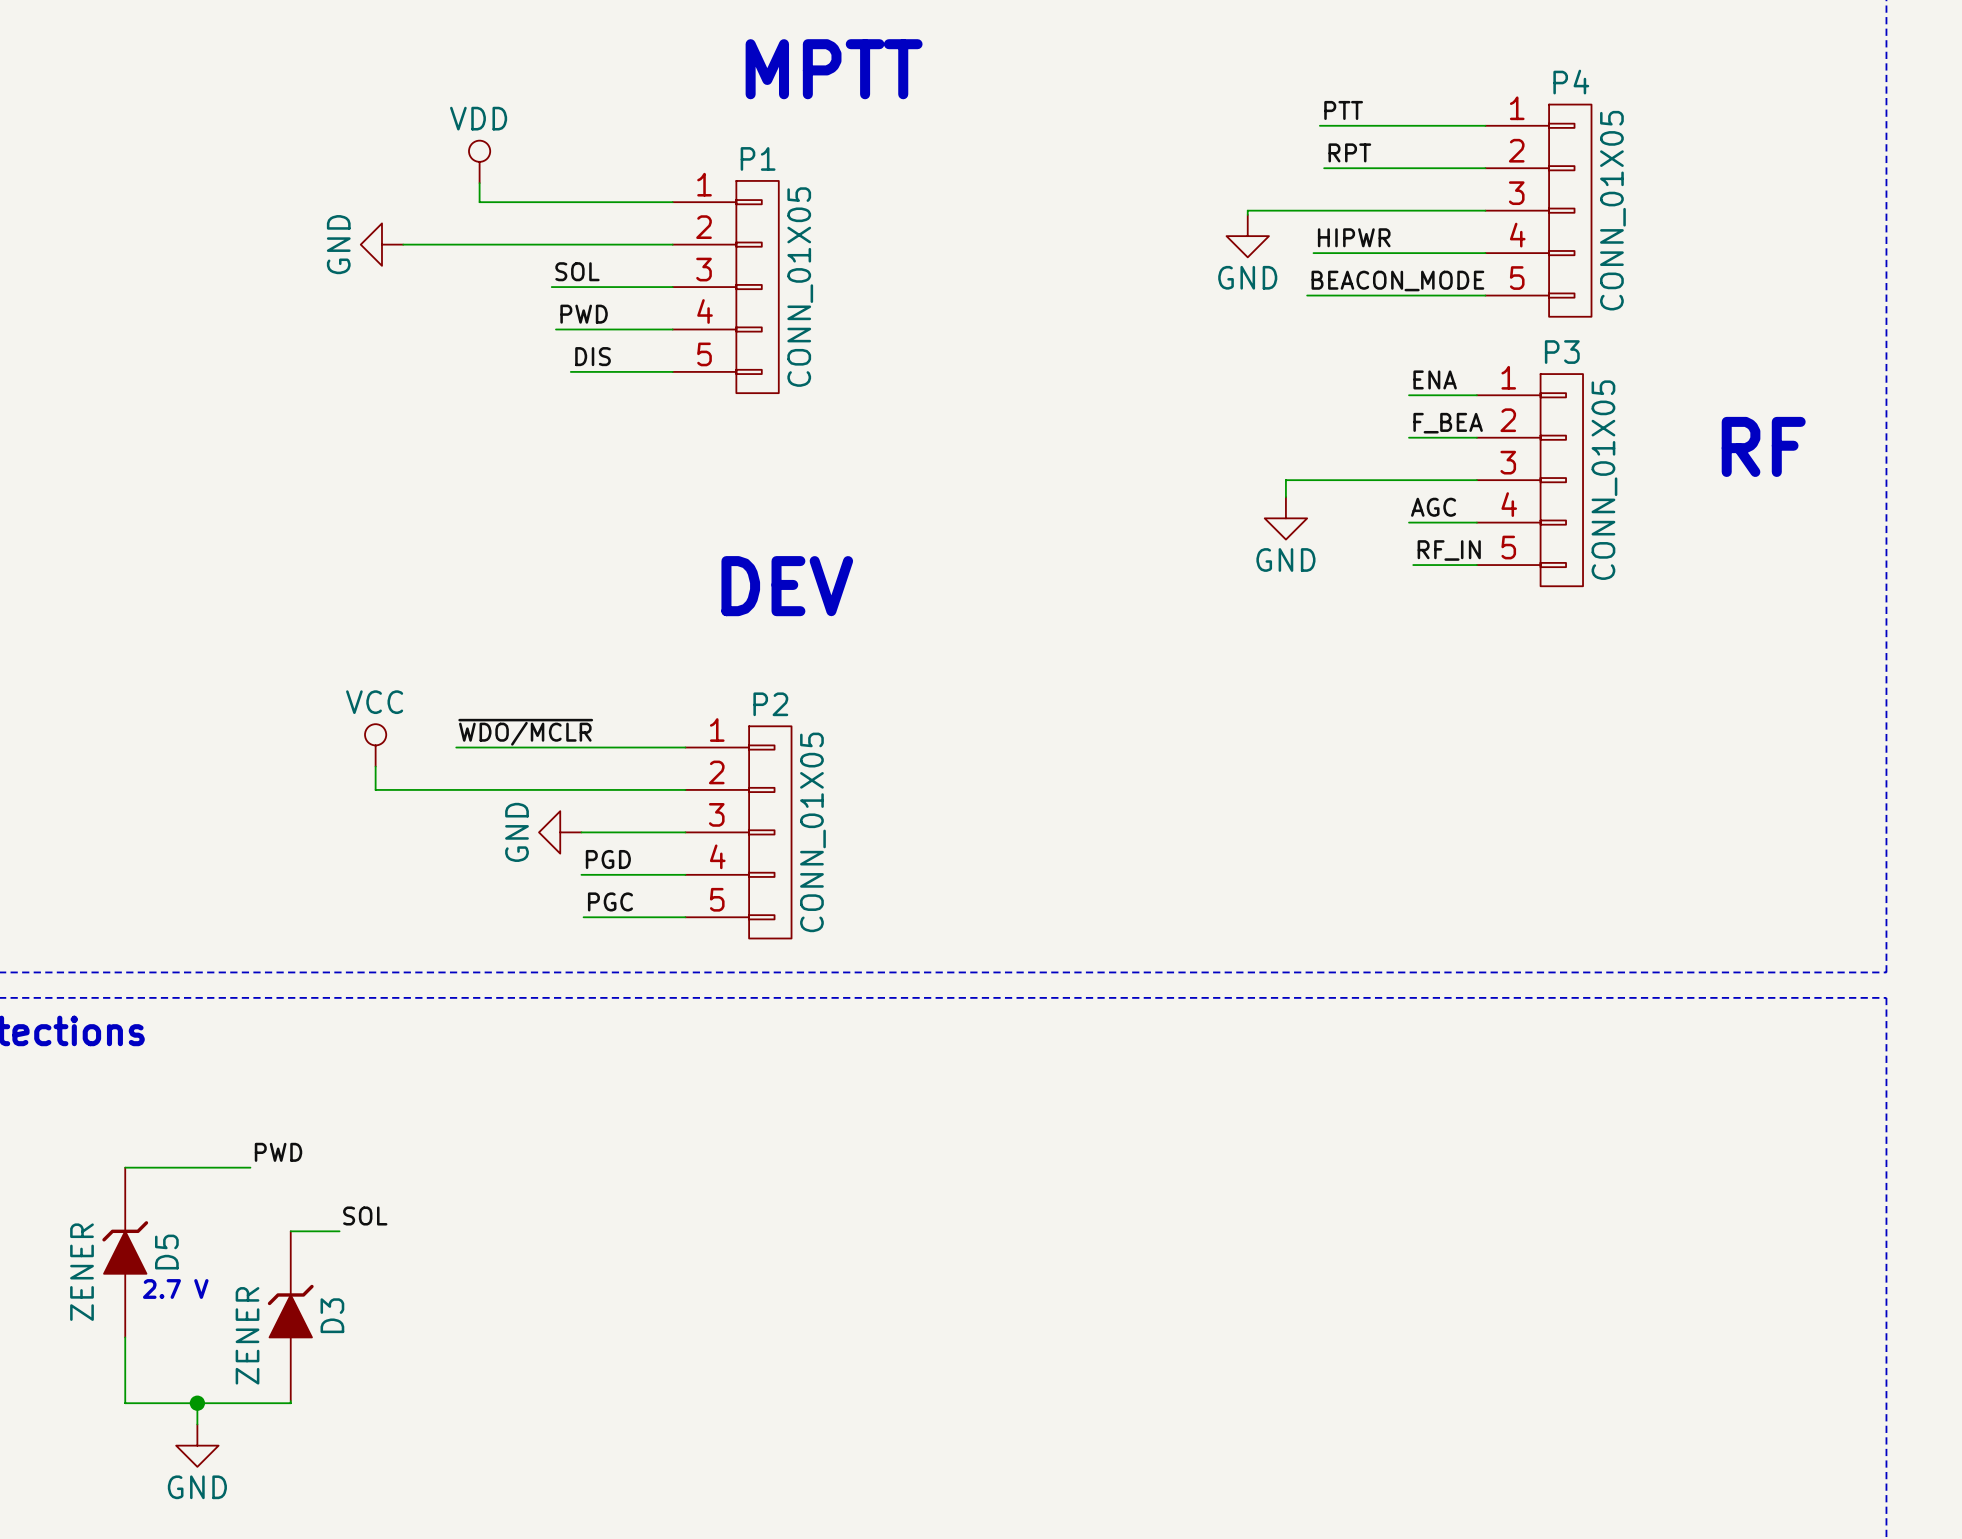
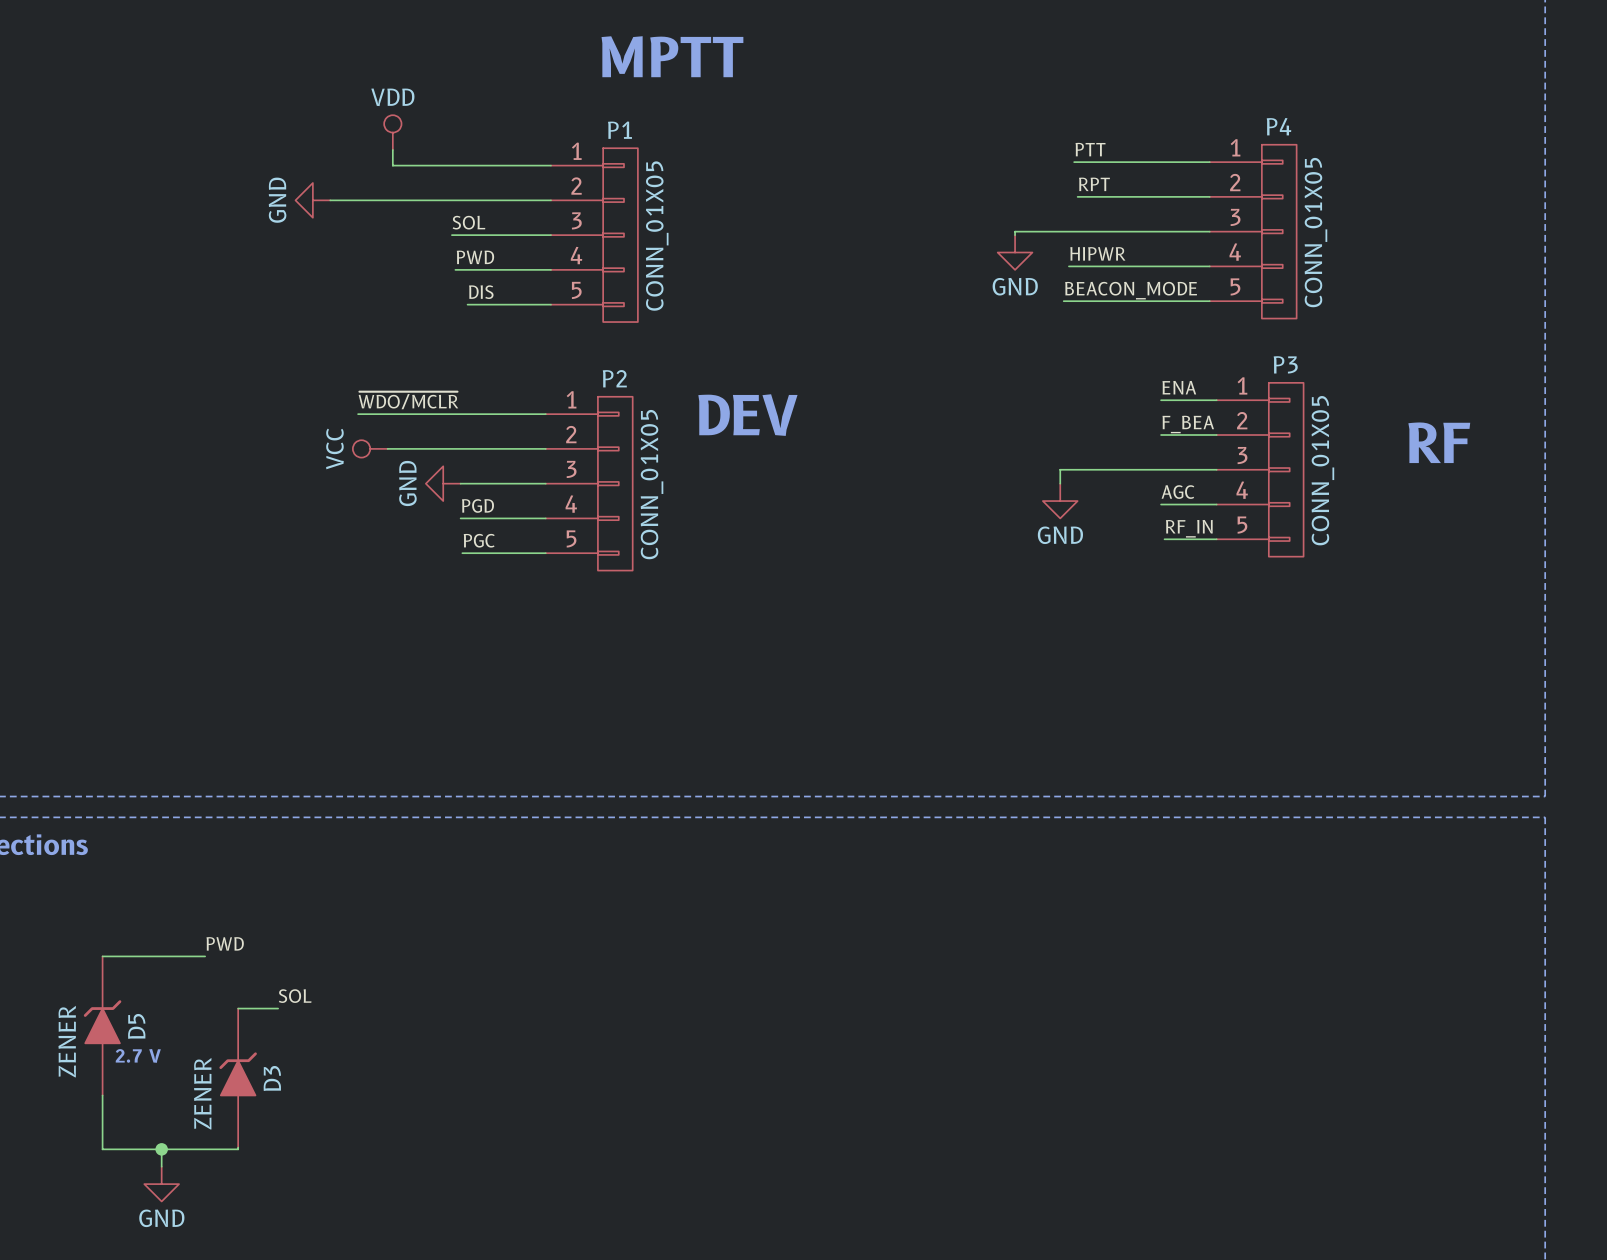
label position: PTT (1343, 110) -> PTT (1090, 149)
wire: (1319, 125) (1485, 125) -> (1074, 162) (1209, 162)
label position: RPT (1349, 152) -> RPT (1094, 184)
wire: (1324, 168) (1485, 168) -> (1077, 196) (1209, 196)
wire: (1485, 210) (1247, 210) (1247, 214) -> (1209, 231) (1015, 231) (1015, 235)
P4 position: (1538, 210) -> (1253, 231)
power symbol position: GND (1247, 236) -> GND (1015, 252)
label position: HIPWR (1354, 237) -> HIPWR (1097, 253)
wire: (1313, 253) (1485, 253) -> (1068, 266) (1209, 266)
label position: BEACON_MODE (1397, 281) -> BEACON_MODE (1131, 290)
wire: (1307, 295) (1485, 295) -> (1063, 301) (1209, 301)
label position: ENA (1435, 379) -> ENA (1179, 387)
wire: (1409, 395) (1476, 395) -> (1161, 400) (1216, 400)
label position: F_BEA (1448, 423) -> F_BEA (1188, 424)
wire: (1409, 437) (1476, 437) -> (1161, 435) (1216, 435)
text position: RF (1763, 446) -> RF (1439, 442)
wire: (1476, 480) (1285, 480) (1285, 497) -> (1216, 469) (1060, 469) (1060, 483)
P3 position: (1529, 480) -> (1260, 469)
label position: AGC (1433, 507) -> AGC (1177, 492)
power symbol position: GND (1285, 518) -> GND (1060, 501)
wire: (1409, 522) (1476, 522) -> (1161, 504) (1216, 504)
wire: none -> (387, 448) (545, 448)
label position: RF_IN (1449, 550) -> RF_IN (1189, 528)
wire: (1413, 565) (1476, 565) -> (1164, 539) (1216, 539)
text position: DEV (787, 586) -> DEV (747, 415)
label position: ~{WDO/MCLR} (525, 732) -> ~{WDO/MCLR} (408, 400)
power symbol rotation: 0° (375, 745) -> 90° counterclockwise (370, 448)
power symbol position: VCC (375, 745) -> VCC (370, 448)
wire: (456, 747) (685, 747) -> (358, 414) (545, 414)
wire: (375, 766) (375, 789) (685, 789) -> none
power symbol position: GND (560, 832) -> GND (443, 483)
wire: (581, 832) (685, 832) -> (460, 483) (545, 483)
P2 position: (738, 832) -> (589, 483)
label position: PGD (608, 859) -> PGD (477, 505)
wire: (581, 874) (685, 874) -> (460, 518) (545, 518)
label position: PGC (610, 901) -> PGC (479, 540)
wire: (583, 917) (685, 917) -> (462, 553) (545, 553)

